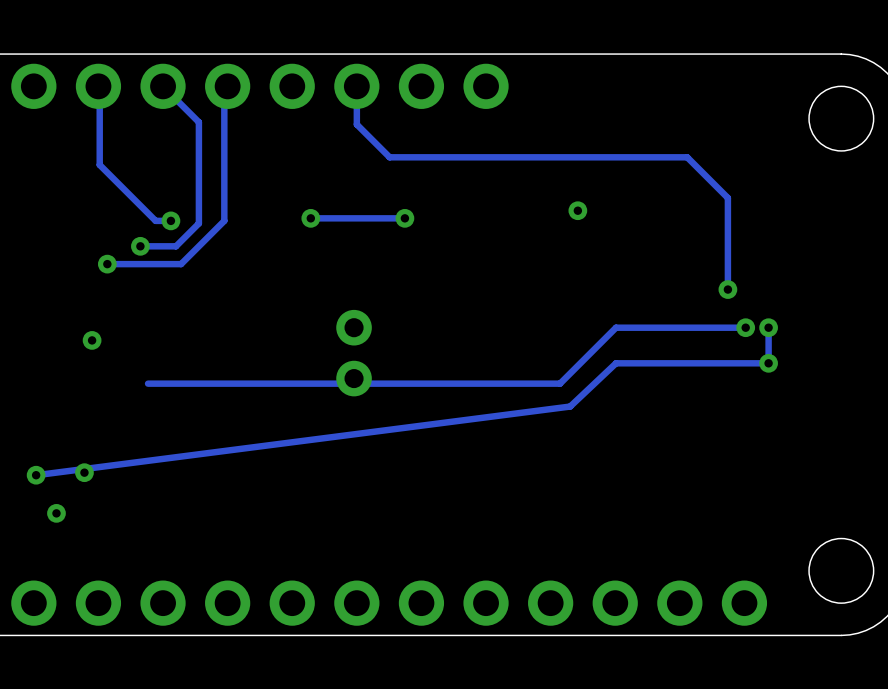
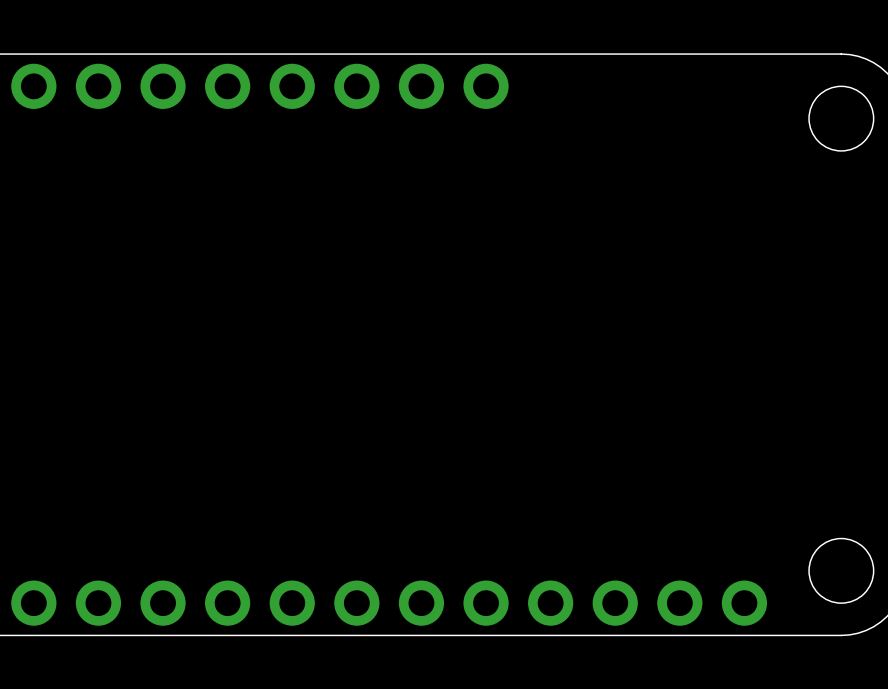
track: (98, 86) (99, 164) (155, 220) (170, 220) -> none
track: (163, 86) (198, 122) (198, 223) (176, 246) (140, 246) -> none
track: (227, 86) (224, 89) (224, 220) (181, 264) (107, 264) -> none
track: (356, 86) (356, 124) (389, 157) (687, 157) (727, 198) (727, 289) -> none
via: (577, 210) -> none
via: (310, 218) -> none
track: (404, 218) (310, 218) -> none
via: (404, 218) -> none
via: (170, 220) -> none
via: (140, 246) -> none
via: (107, 264) -> none
via: (727, 289) -> none
track: (745, 327) (616, 327) (560, 383) (148, 383) -> none
via: (745, 327) -> none
track: (768, 327) (768, 363) (616, 363) (570, 406) (36, 475) -> none
via: (768, 327) -> none
via: (92, 340) -> none
part: (354, 353) -> none
via: (768, 363) -> none
via: (84, 472) -> none
via: (36, 475) -> none
via: (56, 513) -> none

